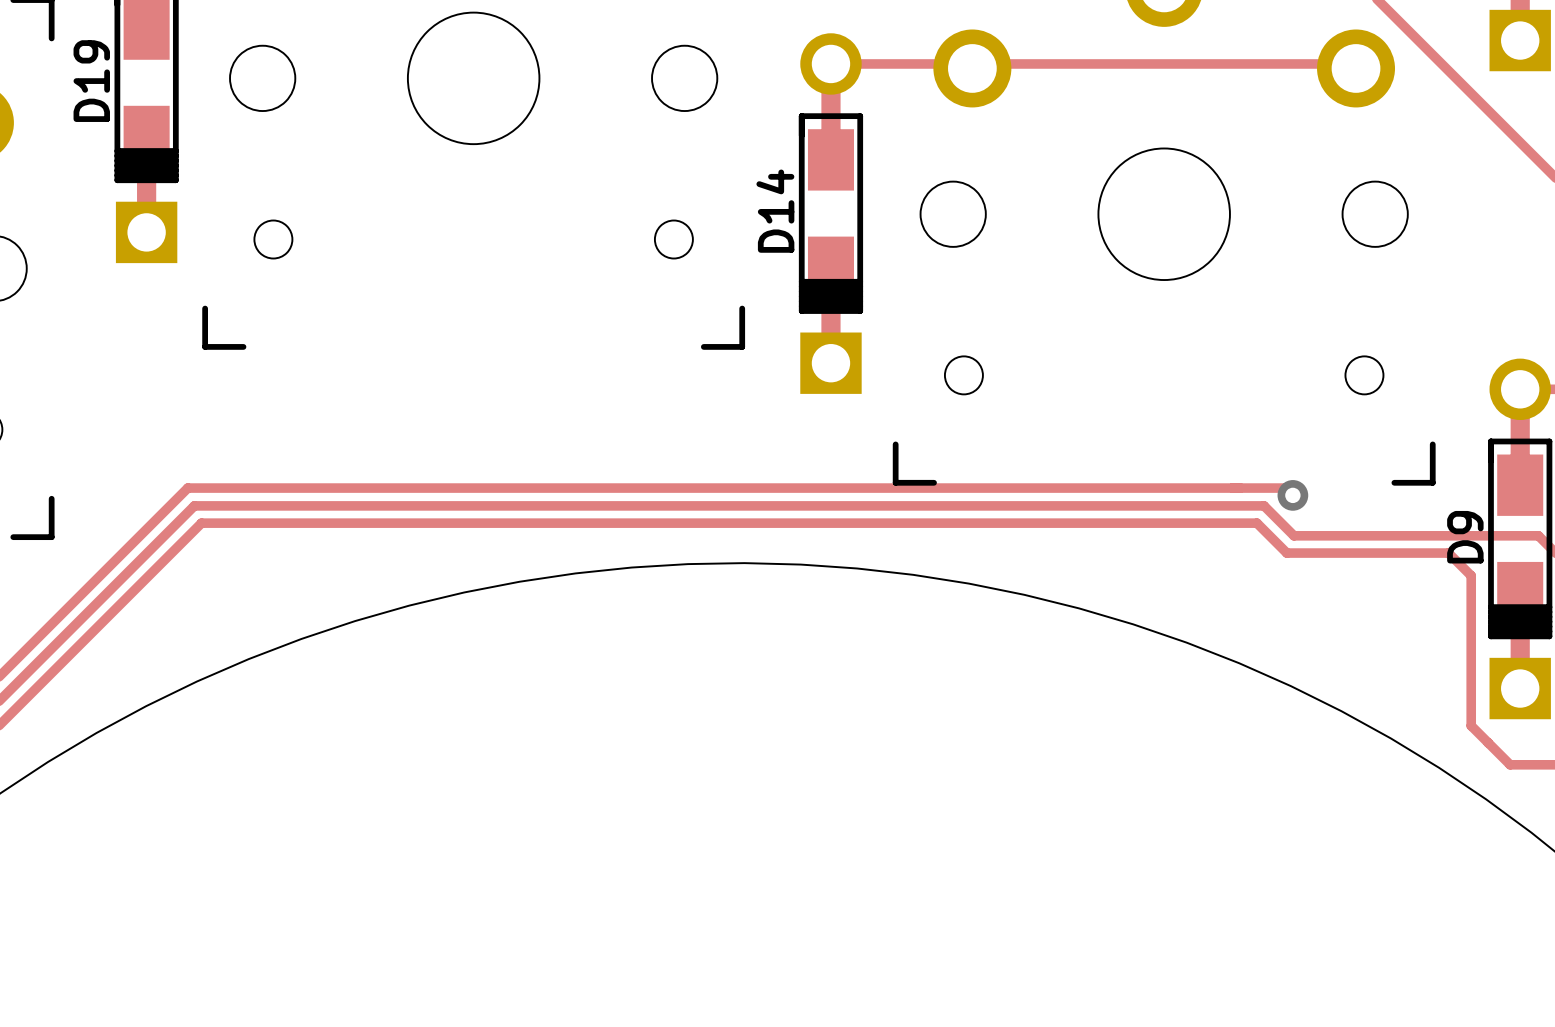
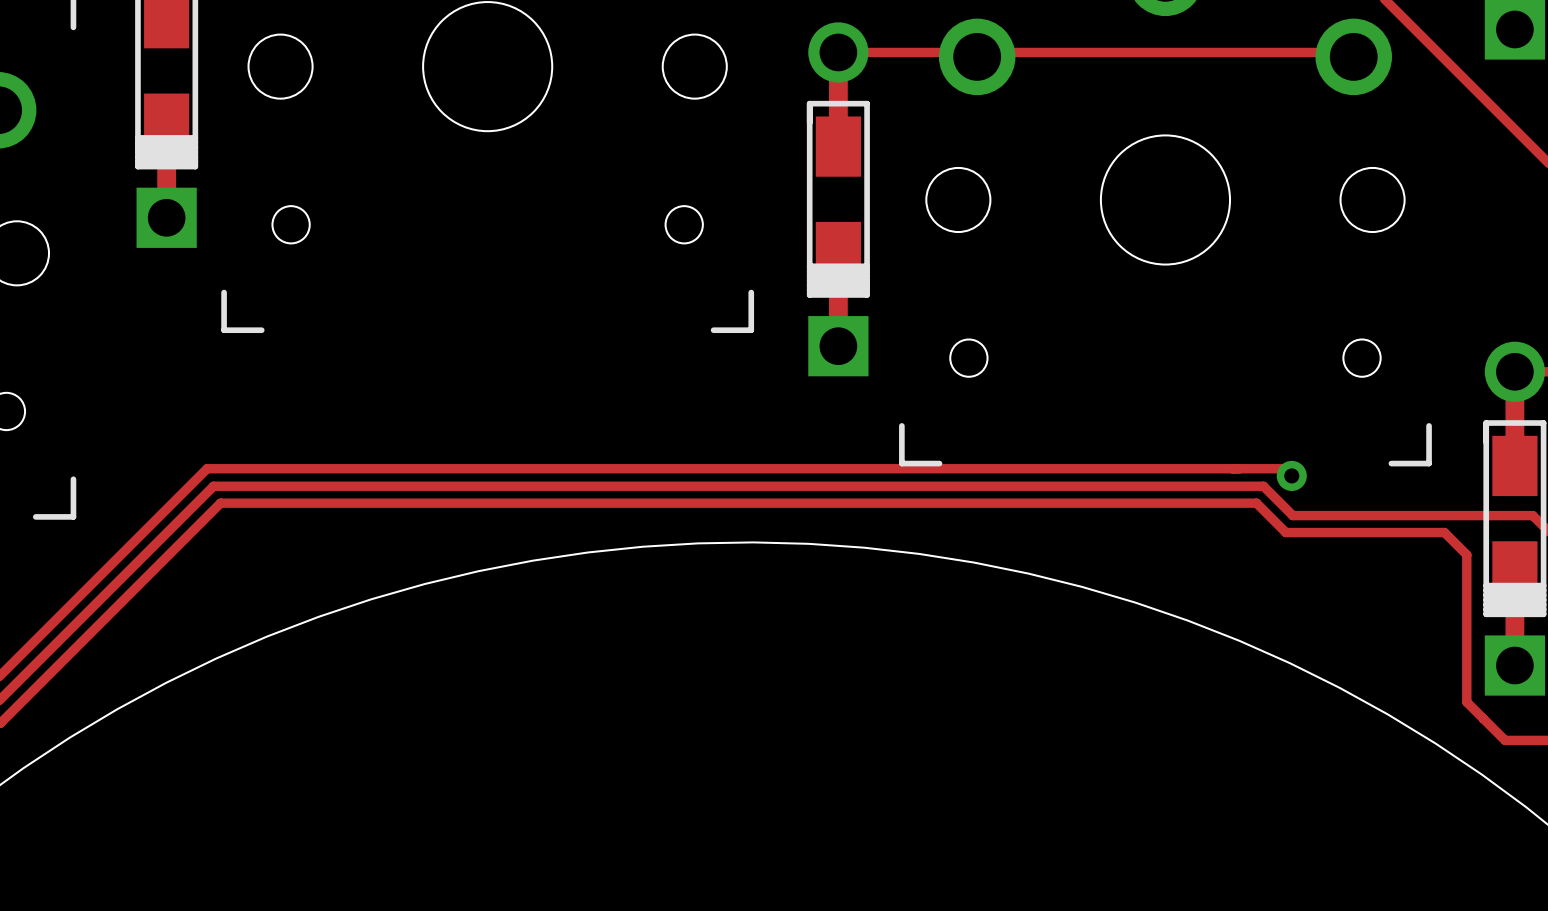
D19 name: D19 (91, 81) -> none
D14 name: D14 (775, 211) -> none
D9 name: D9 (1465, 537) -> none

